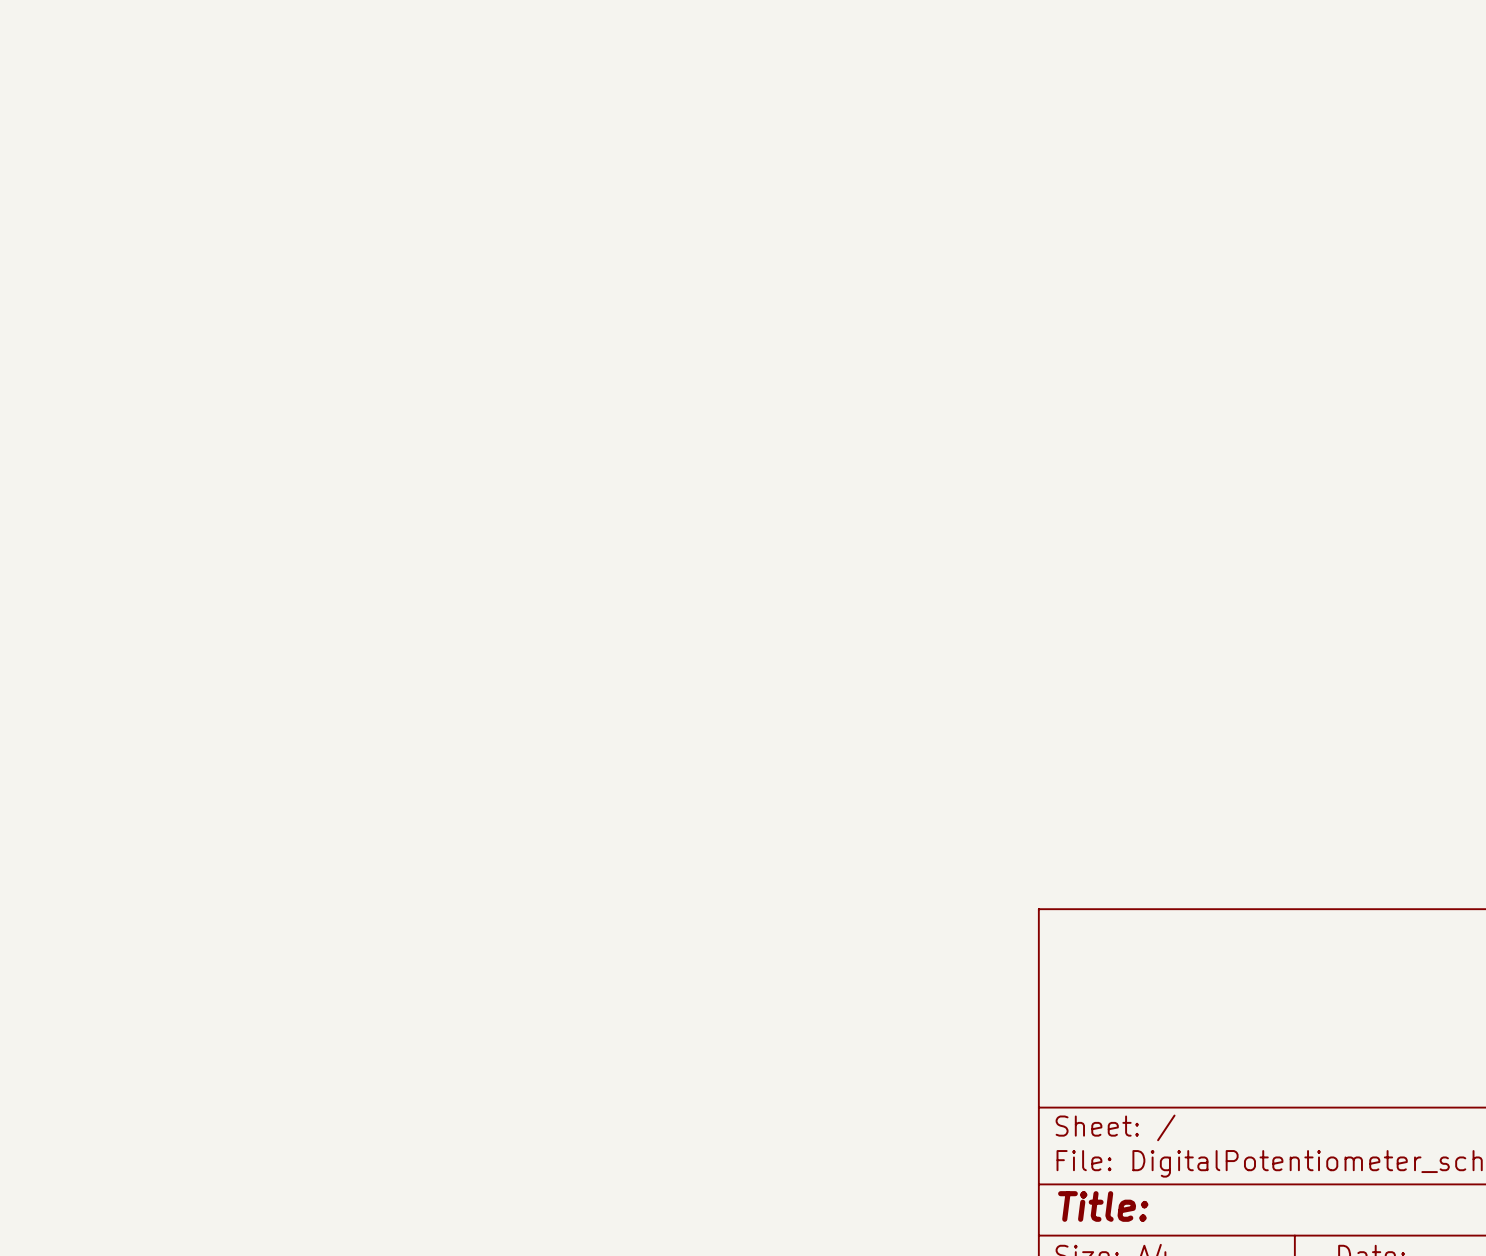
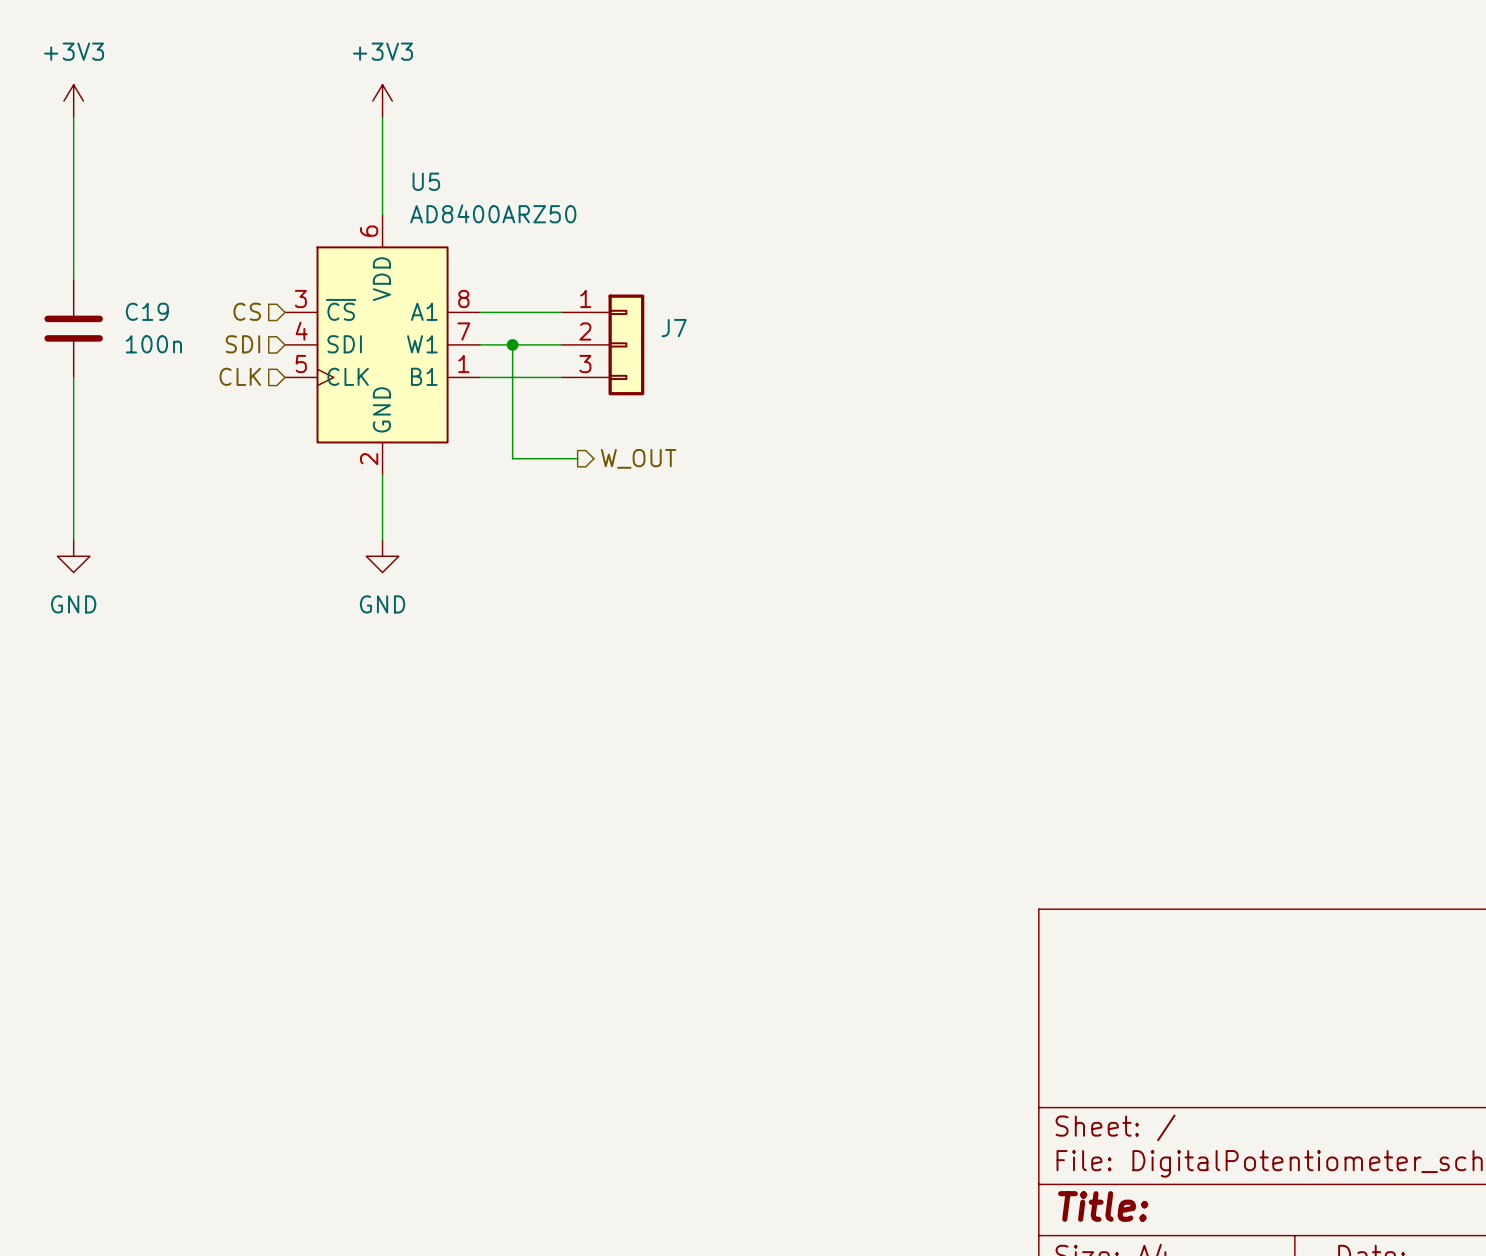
power symbol: none -> +3V3 (73, 101)
power symbol: none -> +3V3 (382, 101)
wire: none -> (73, 117) (73, 279)
wire: none -> (382, 117) (382, 214)
hierarchical label: none -> CS (247, 311)
wire: none -> (480, 312) (561, 312)
C19: none -> 100n (73, 328)
hierarchical label: none -> SDI (242, 344)
U5: none -> AD8400ARZ50 (382, 344)
wire: none -> (480, 344) (561, 344)
wire: none -> (512, 344) (512, 458) (577, 458)
junction: none -> (512, 344)
J7: none -> (602, 344)
hierarchical label: none -> CLK (240, 376)
wire: none -> (73, 377) (73, 540)
wire: none -> (480, 377) (561, 377)
hierarchical label: none -> W_OUT (638, 458)
wire: none -> (382, 474) (382, 540)
power symbol: none -> GND (73, 556)
power symbol: none -> GND (382, 556)

